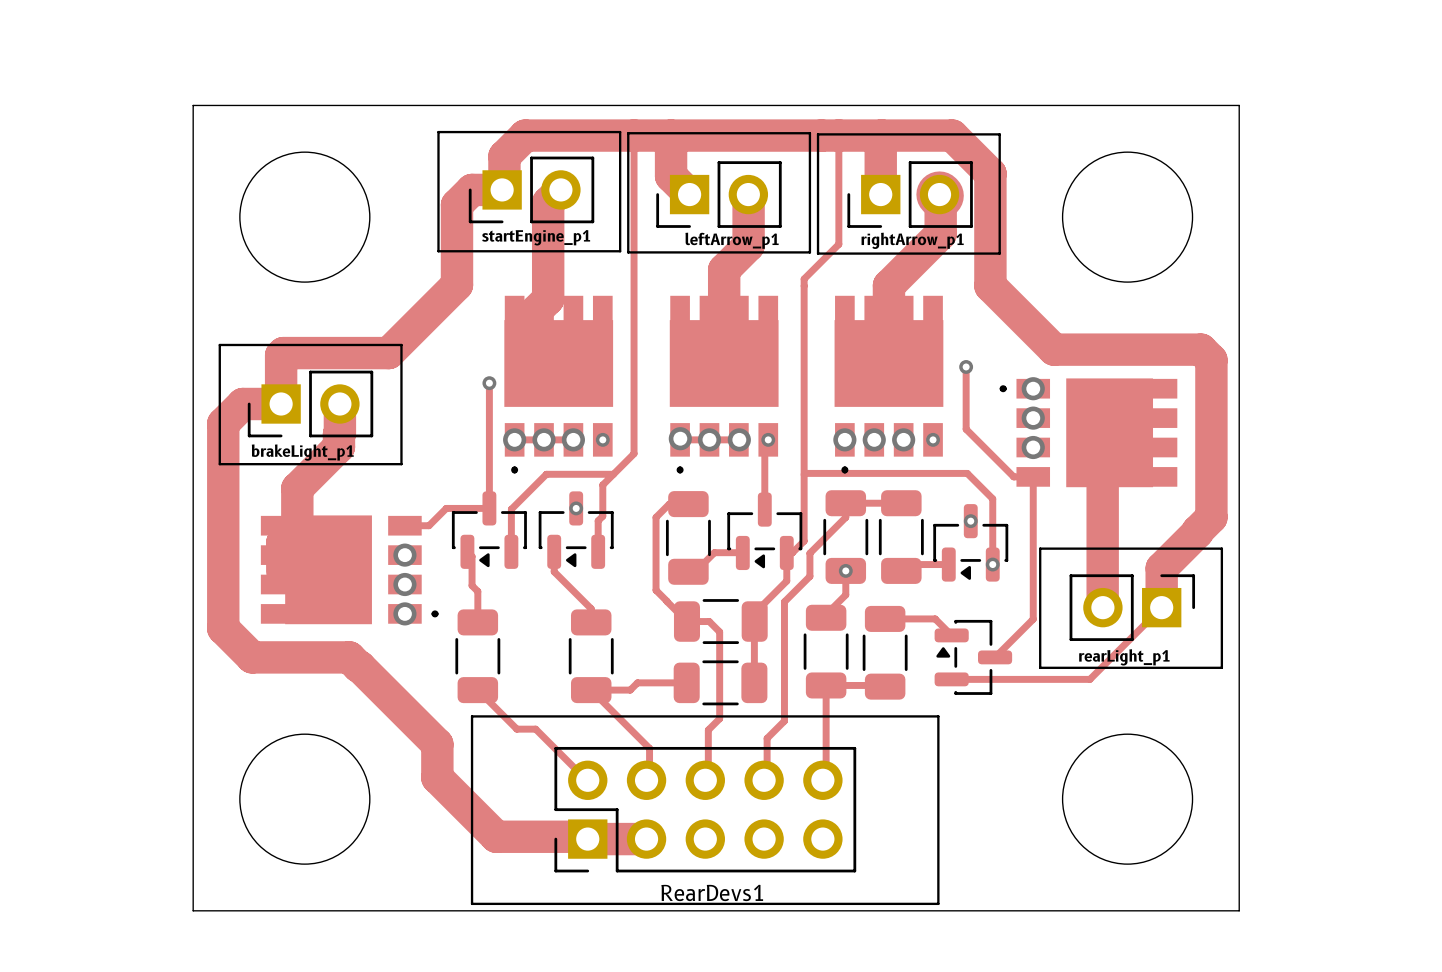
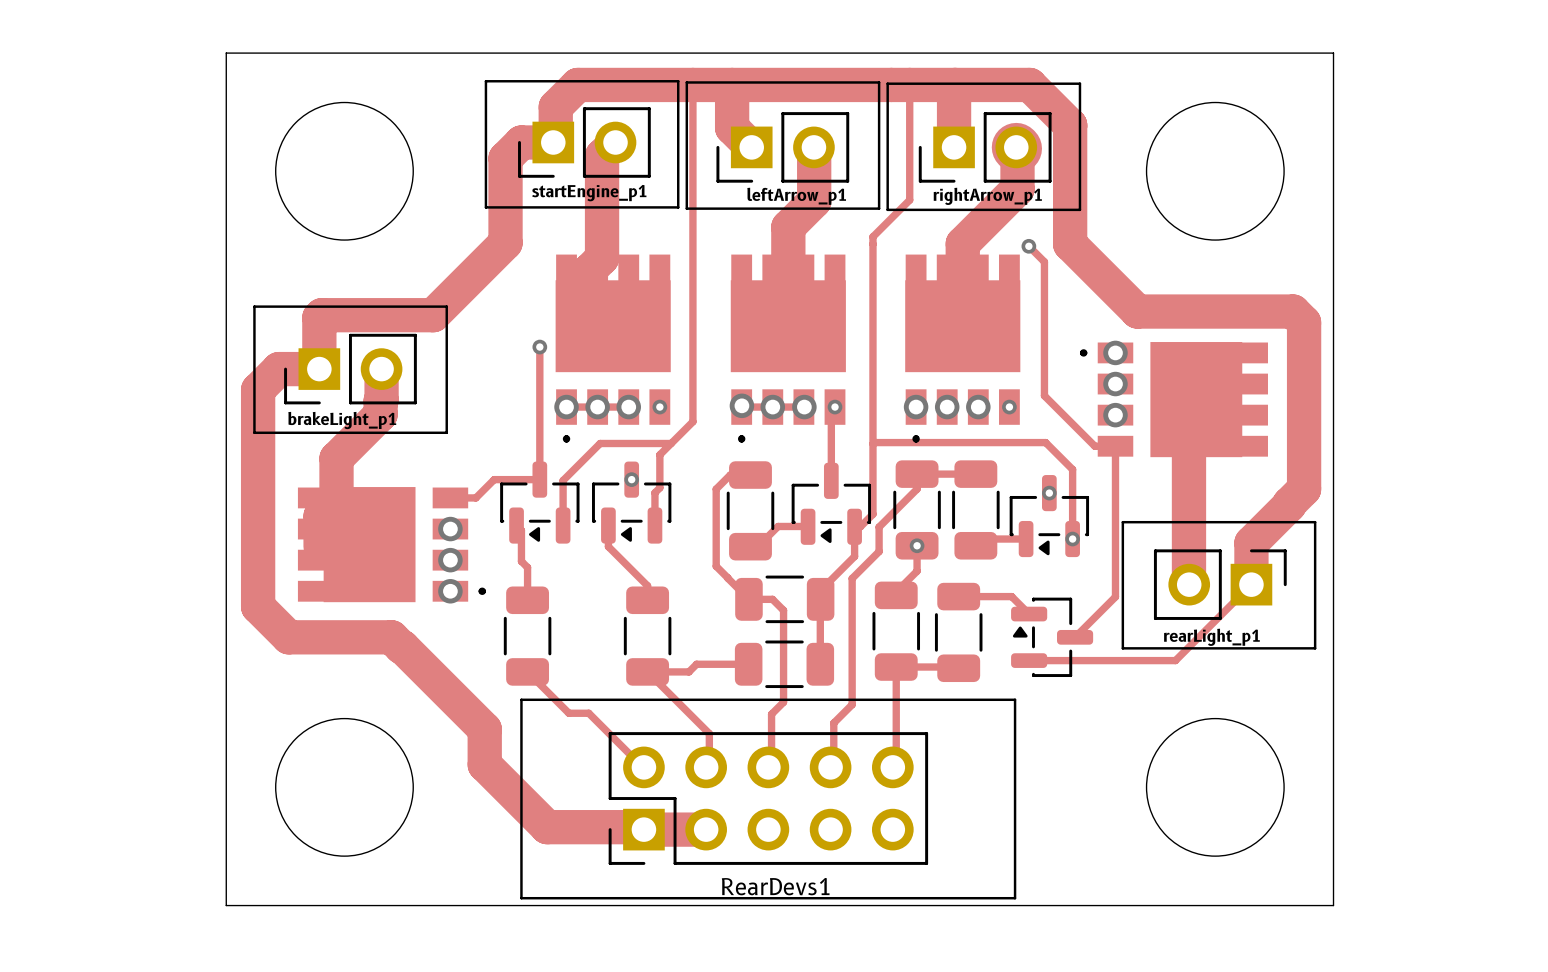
track: none -> (1028, 246) (1044, 261) (1044, 329)
via position: (966, 366) -> (1028, 246)

